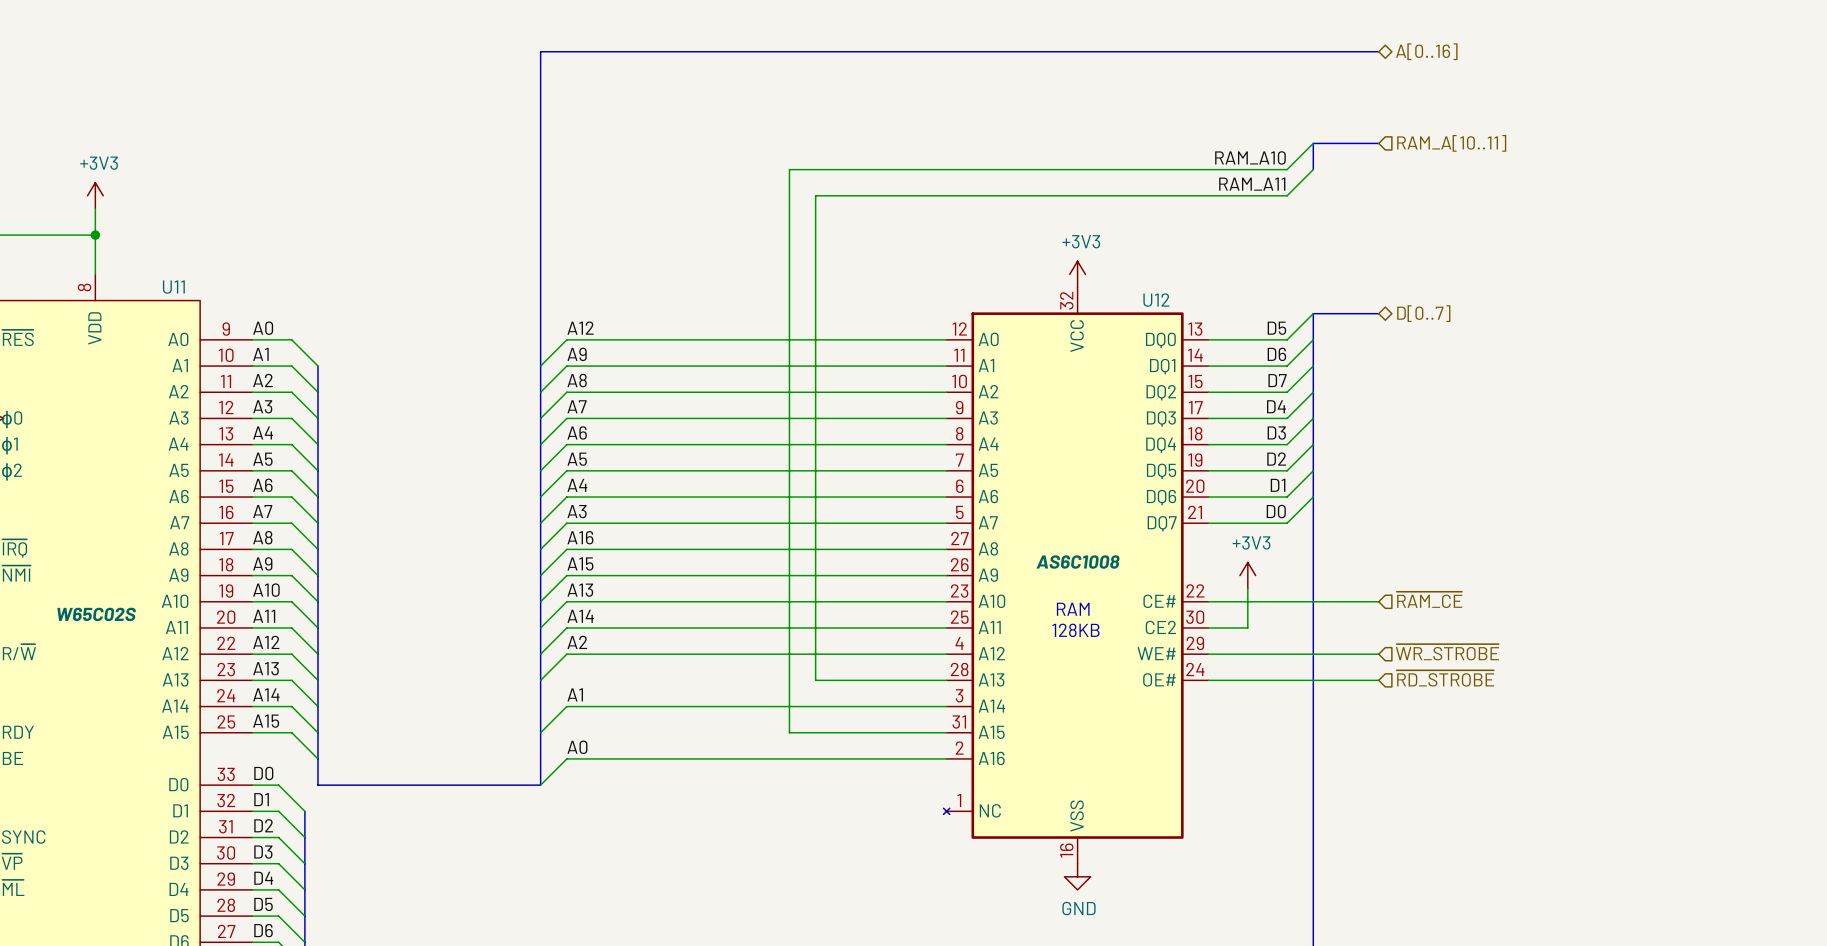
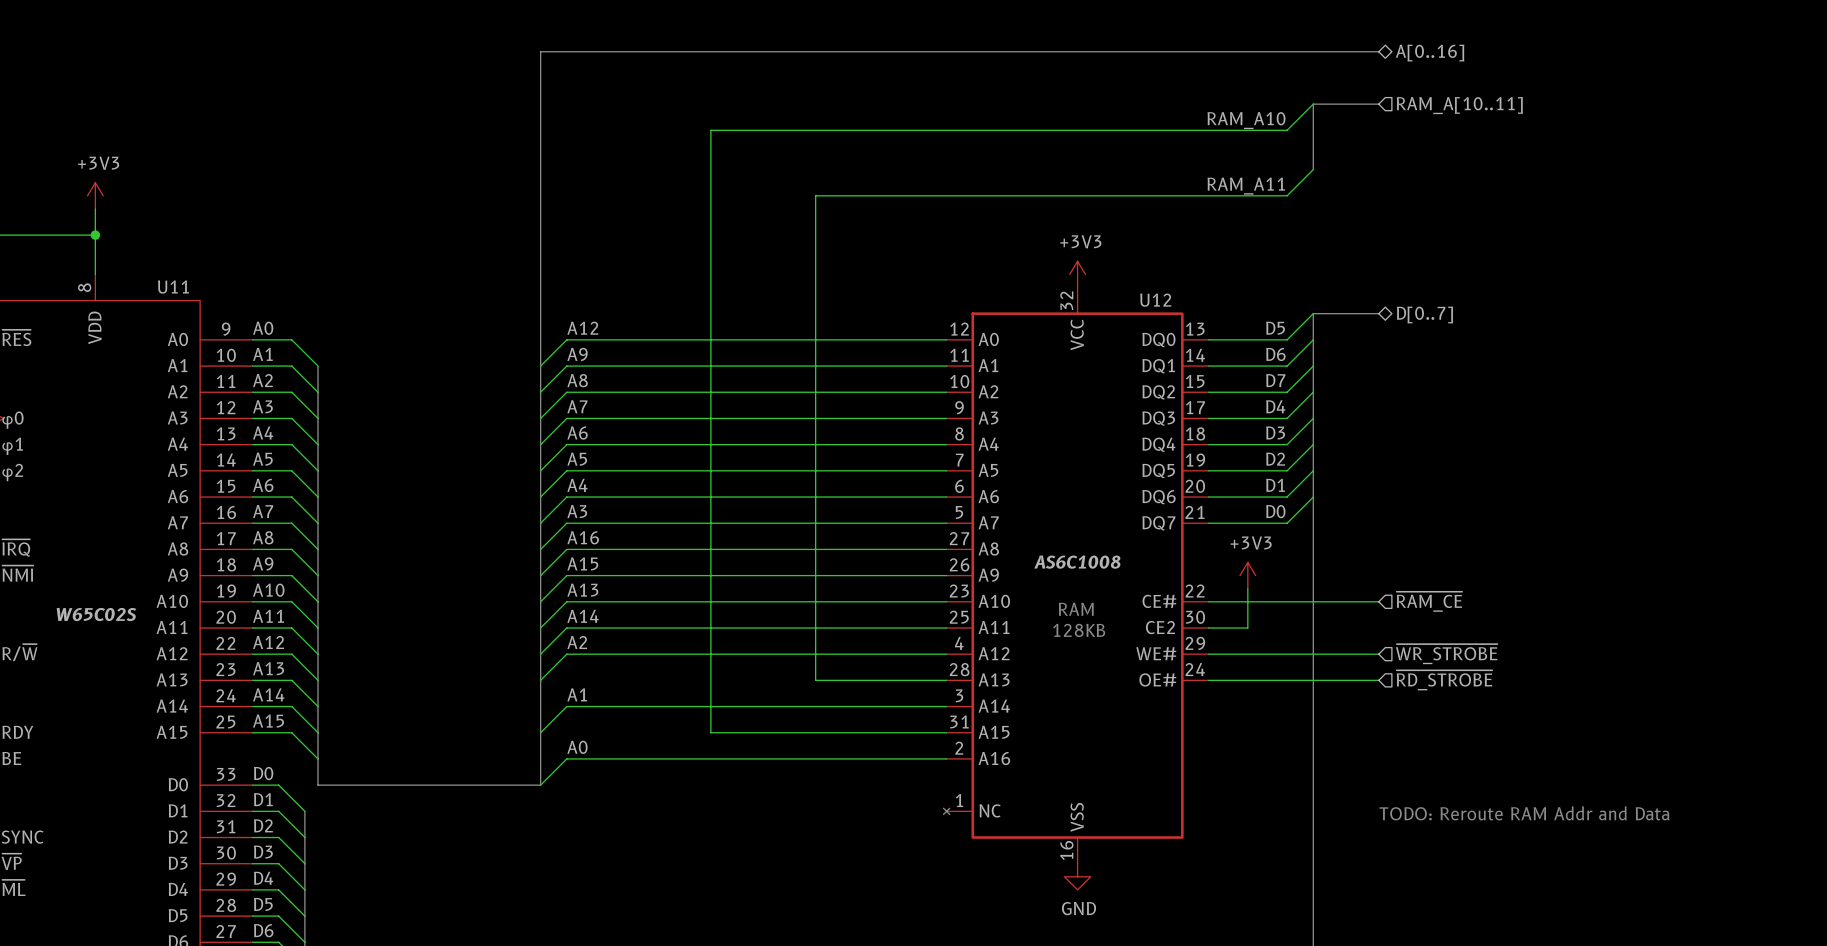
wire: (1313, 143) (1287, 169) (789, 169) (789, 732) -> (1313, 104) (1287, 130) (710, 130) (710, 732) (789, 732)
bus: (1313, 143) (1378, 143) -> (1313, 143) (1313, 104) (1378, 104)
hierarchical label position: RAM_A[10..11] (1451, 143) -> RAM_A[10..11] (1459, 105)
label position: RAM_A10 (1250, 157) -> RAM_A10 (1246, 120)
text: none -> TODO: Reroute RAM Addr and Data (1524, 813)

